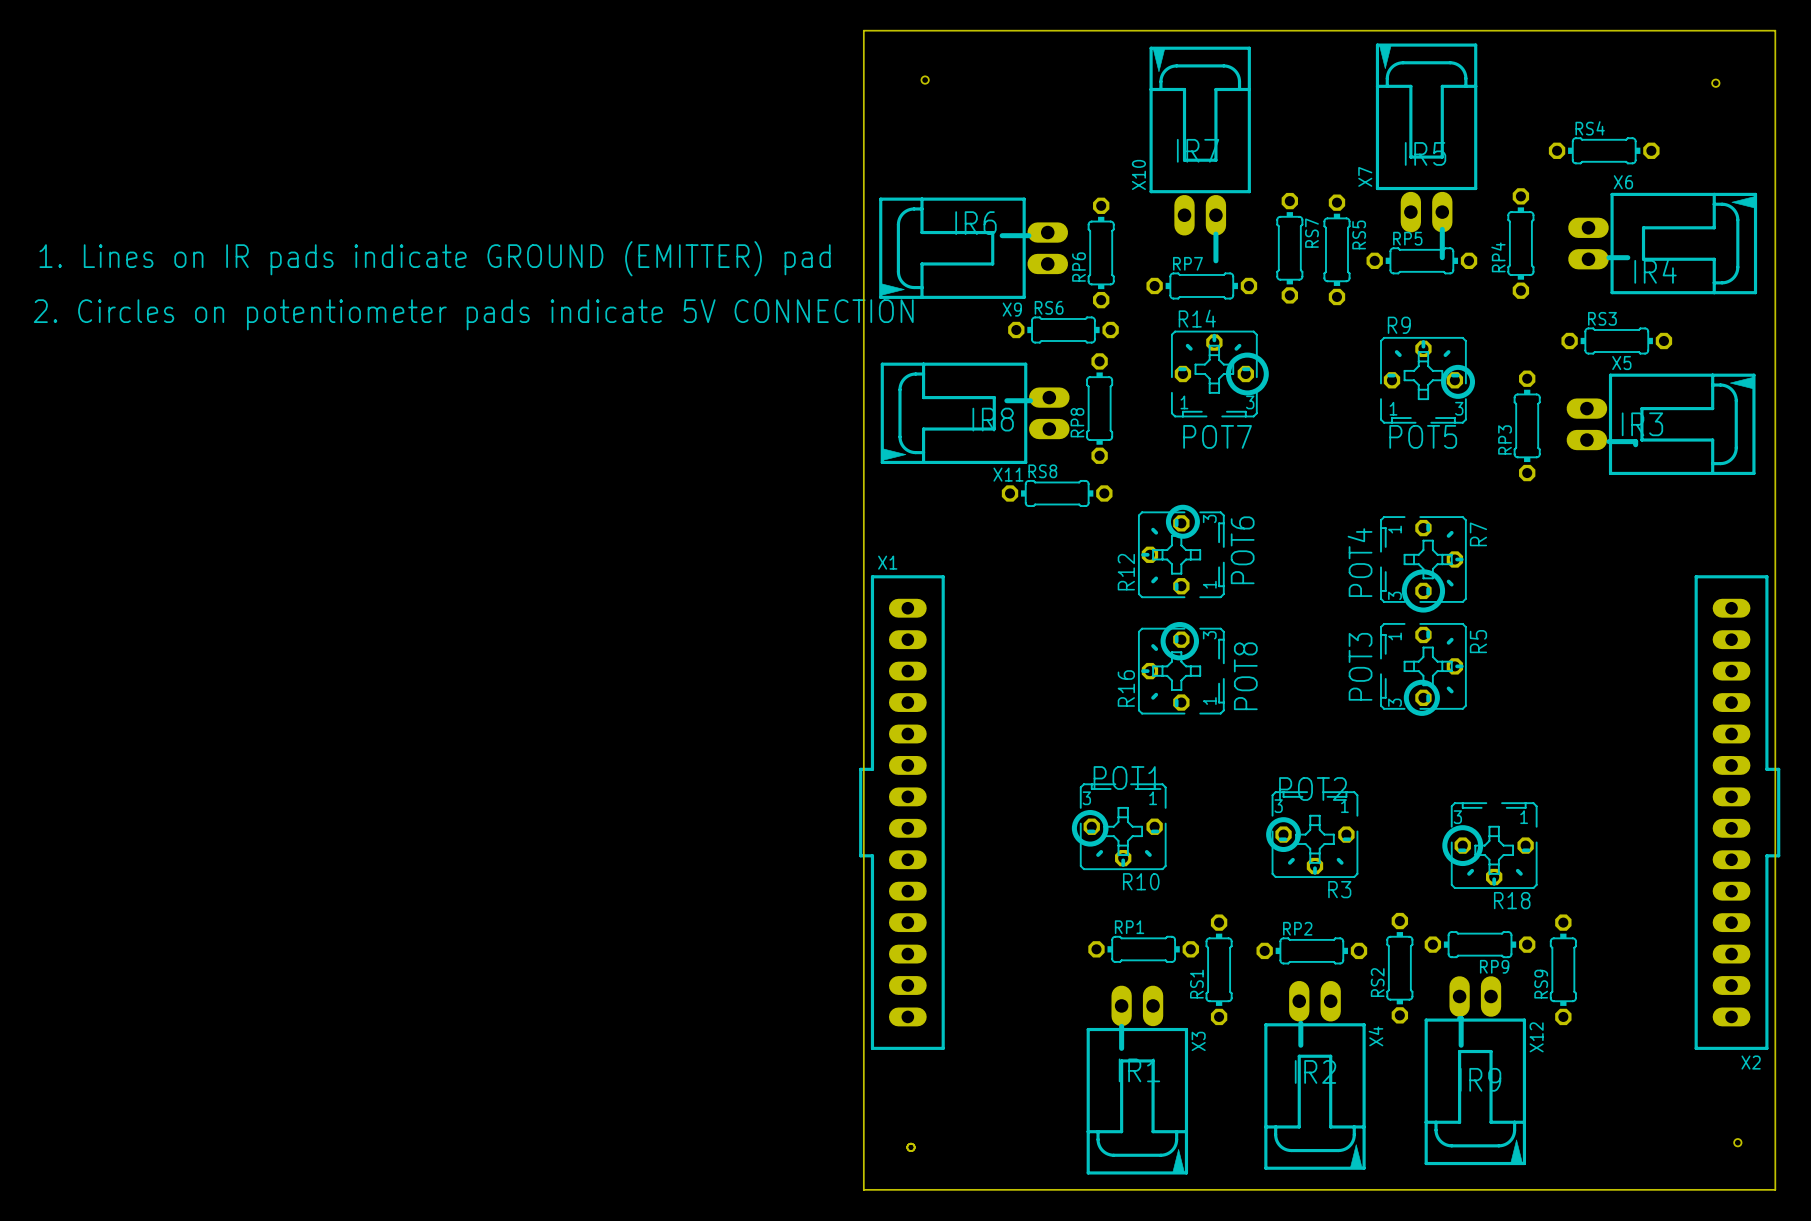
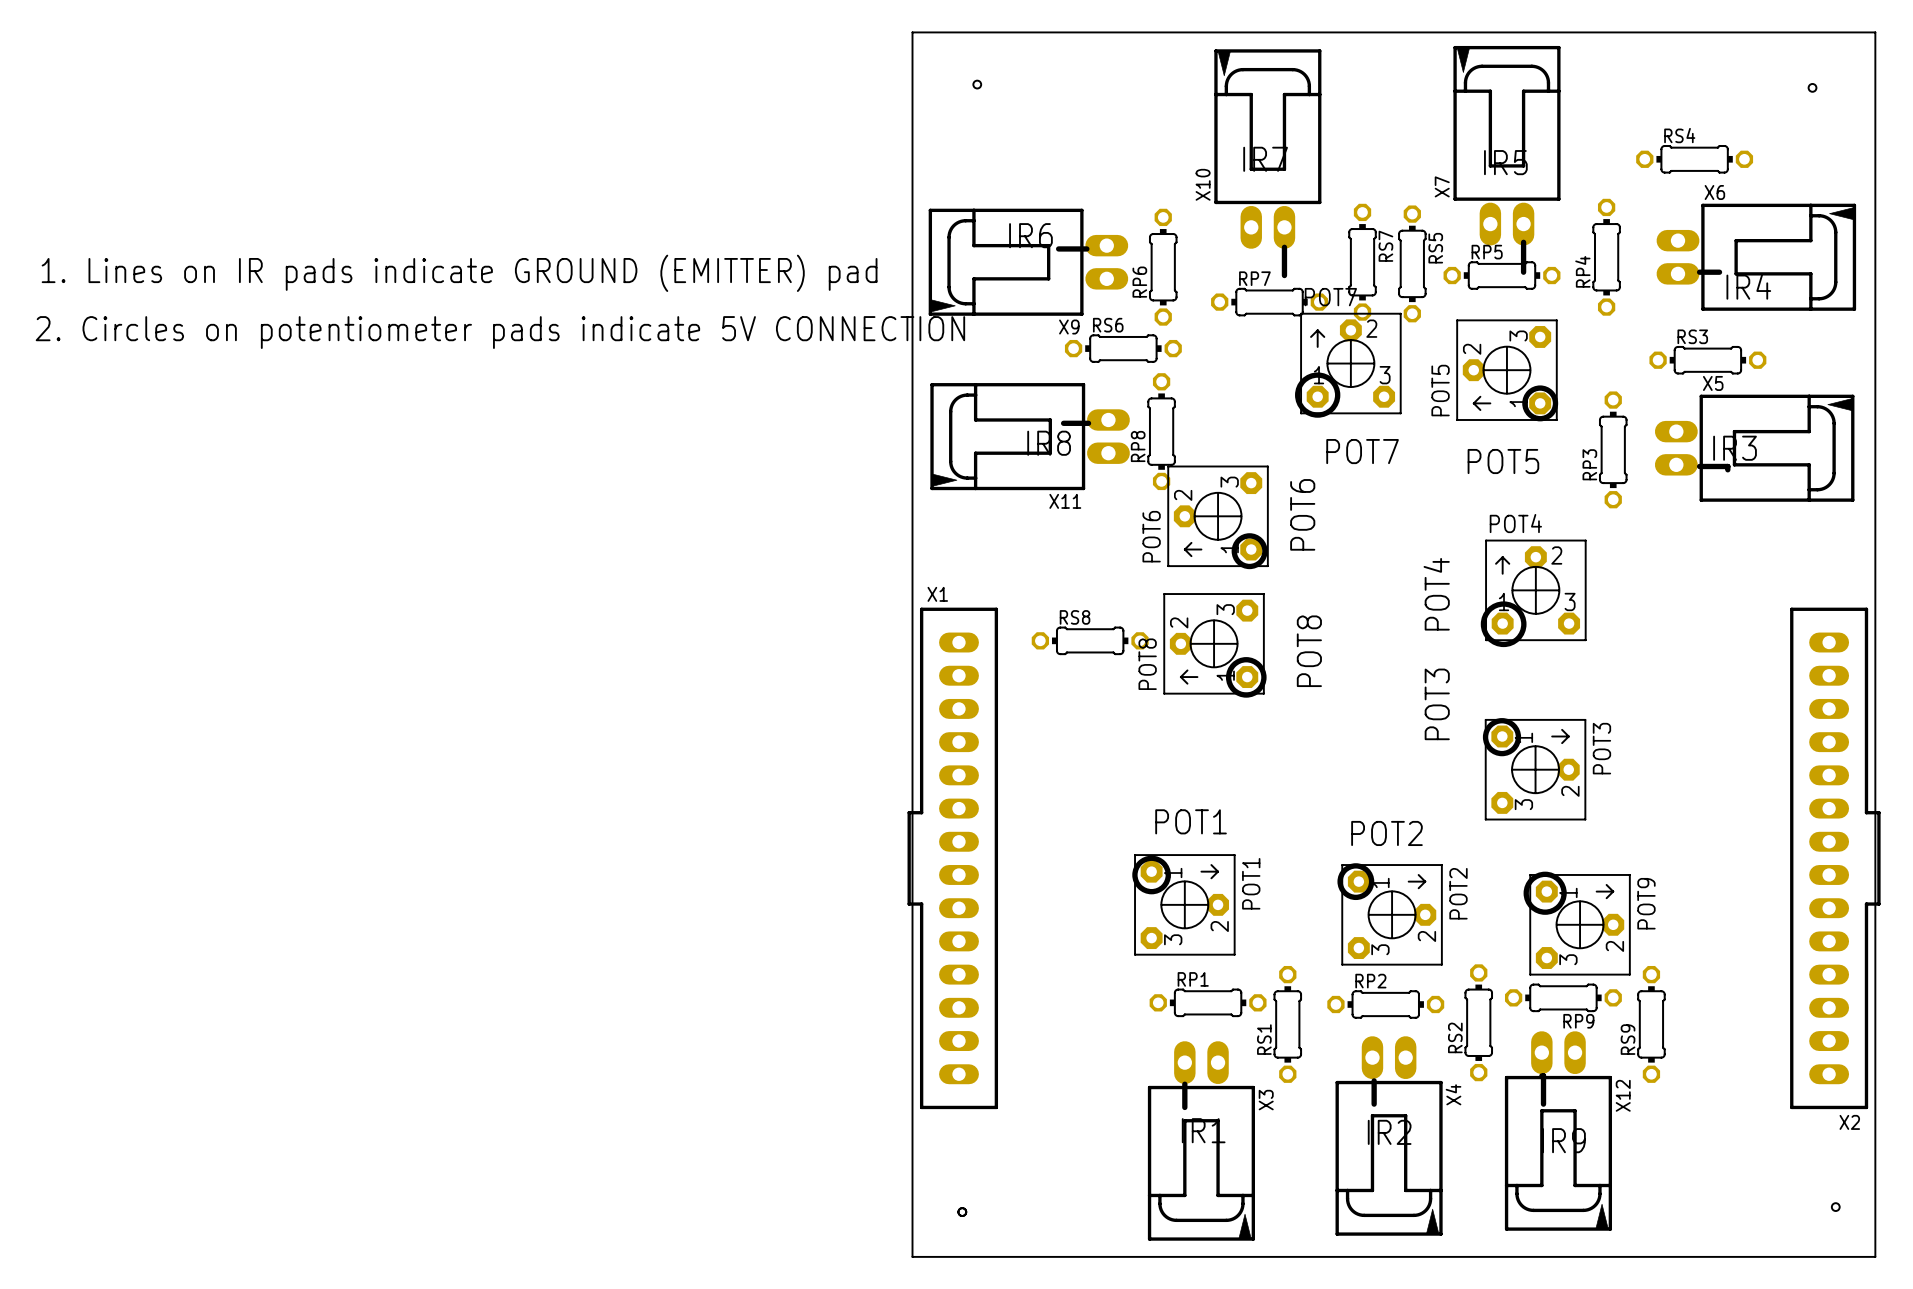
POT7: none -> (1350, 363)
POT5: none -> (1506, 370)
R14: (1214, 374) -> none
R9: (1423, 380) -> none
text position: POT7 (1217, 436) -> POT7 (1362, 451)
POT6: none -> (1218, 516)
RS8 position: (1057, 493) -> (1090, 640)
text position: POT6 (1242, 550) -> POT6 (1302, 514)
R12: (1181, 554) -> none
POT4: none -> (1535, 590)
R7: (1423, 559) -> none
POT8: none -> (1214, 643)
R5: (1423, 666) -> none
R16: (1181, 671) -> none
text position: POT8 (1245, 676) -> POT8 (1309, 651)
POT3: none -> (1535, 769)
R10: (1123, 826) -> none
R3: (1314, 834) -> none
R18: (1494, 845) -> none
POT1: none -> (1184, 904)
POT2: none -> (1392, 914)
POT9: none -> (1580, 924)

